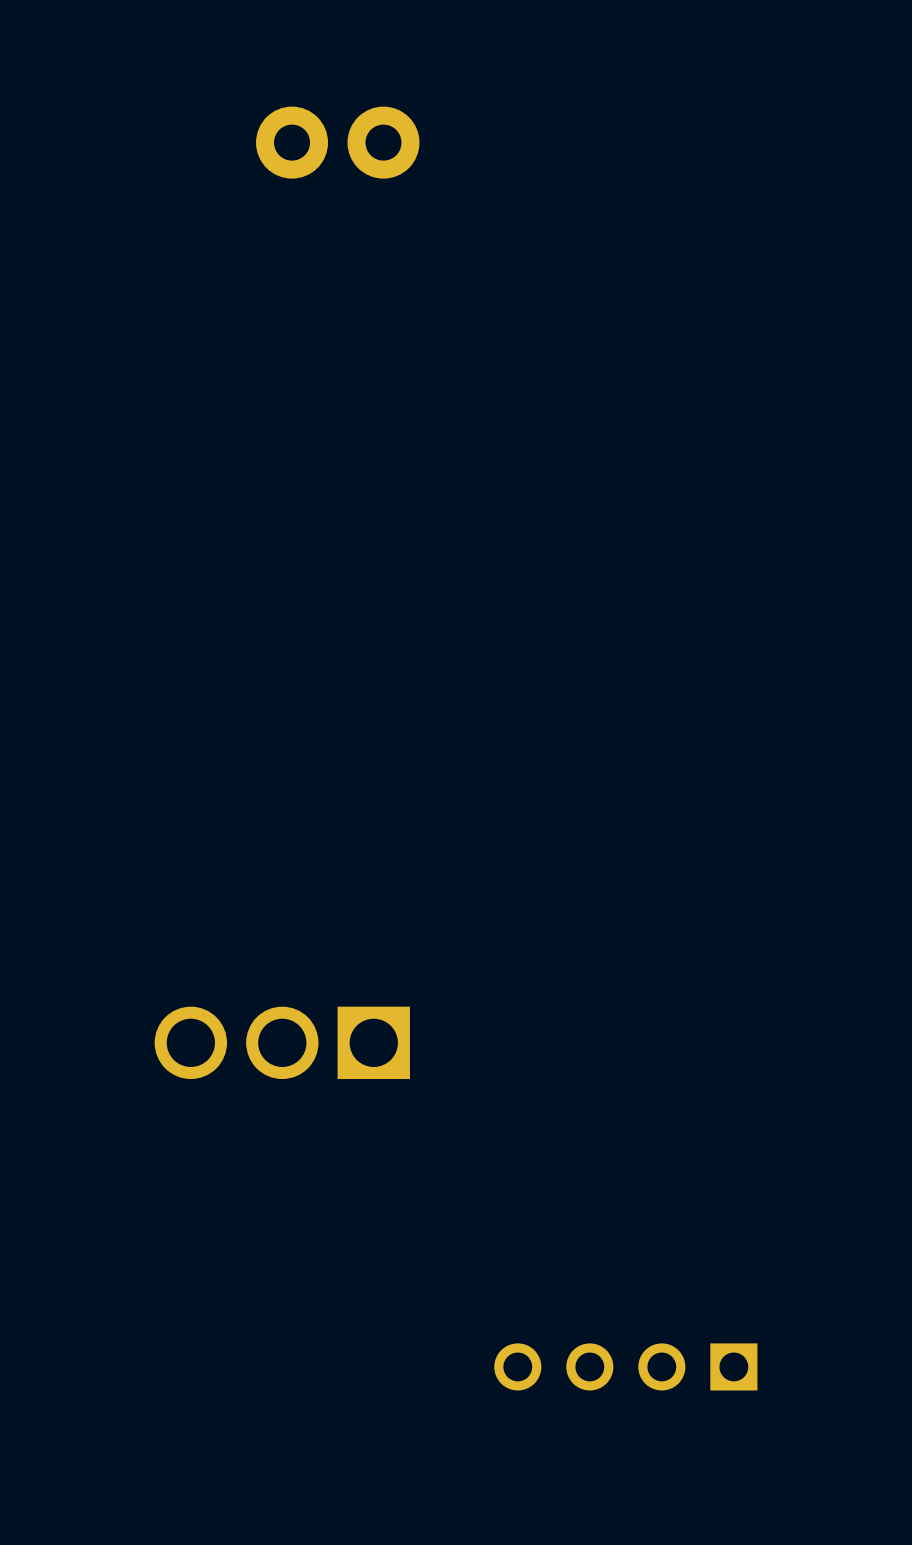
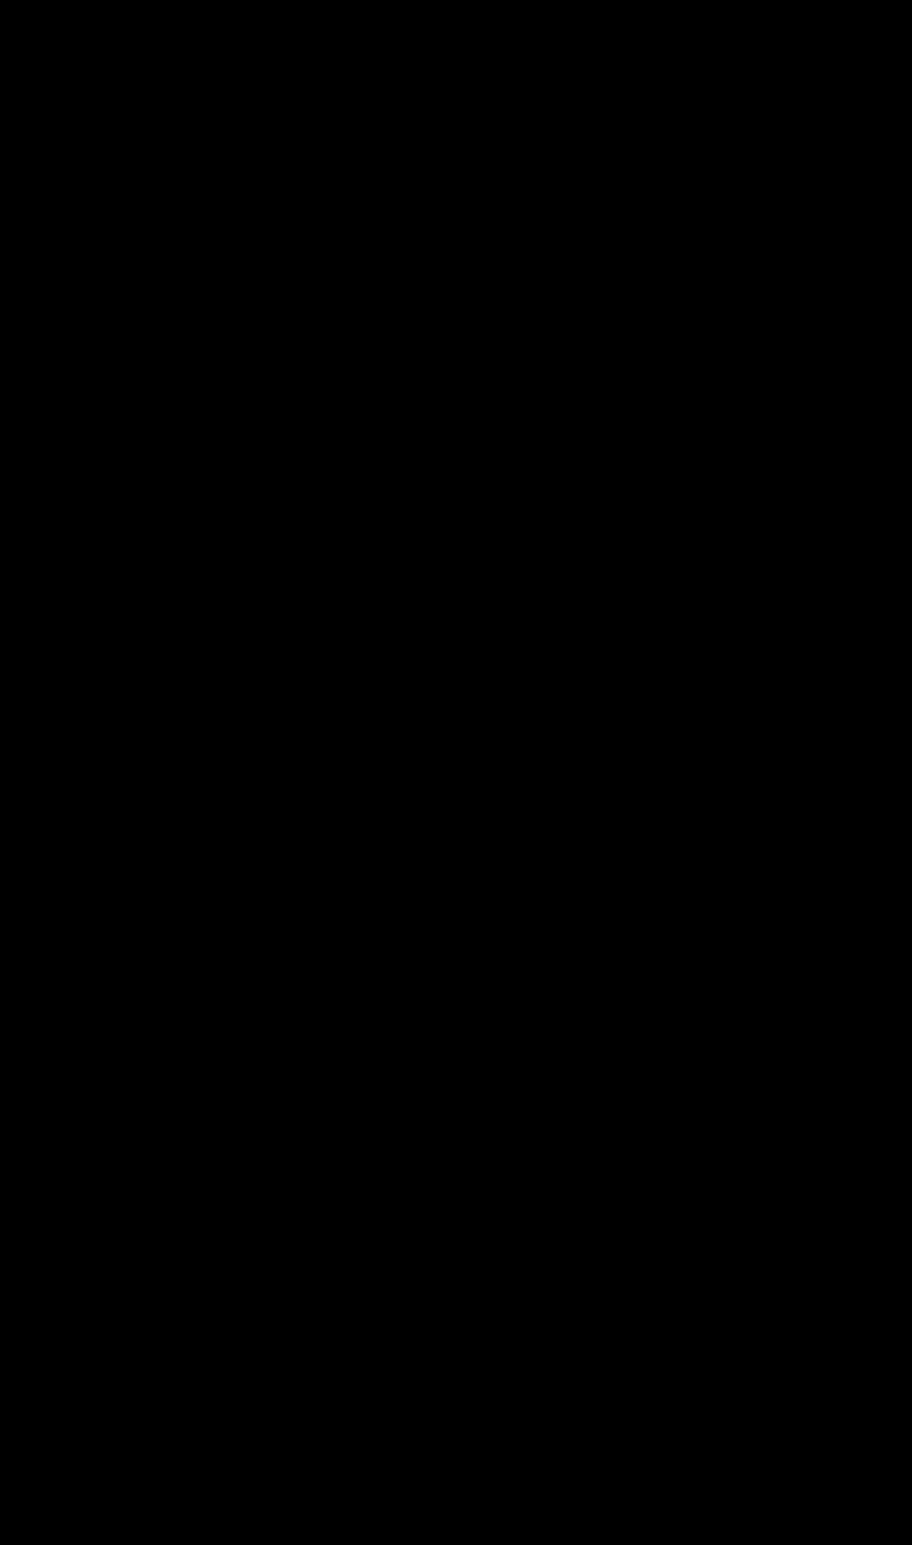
part: (337, 142) -> none
part: (282, 1042) -> none
part: (625, 1366) -> none

